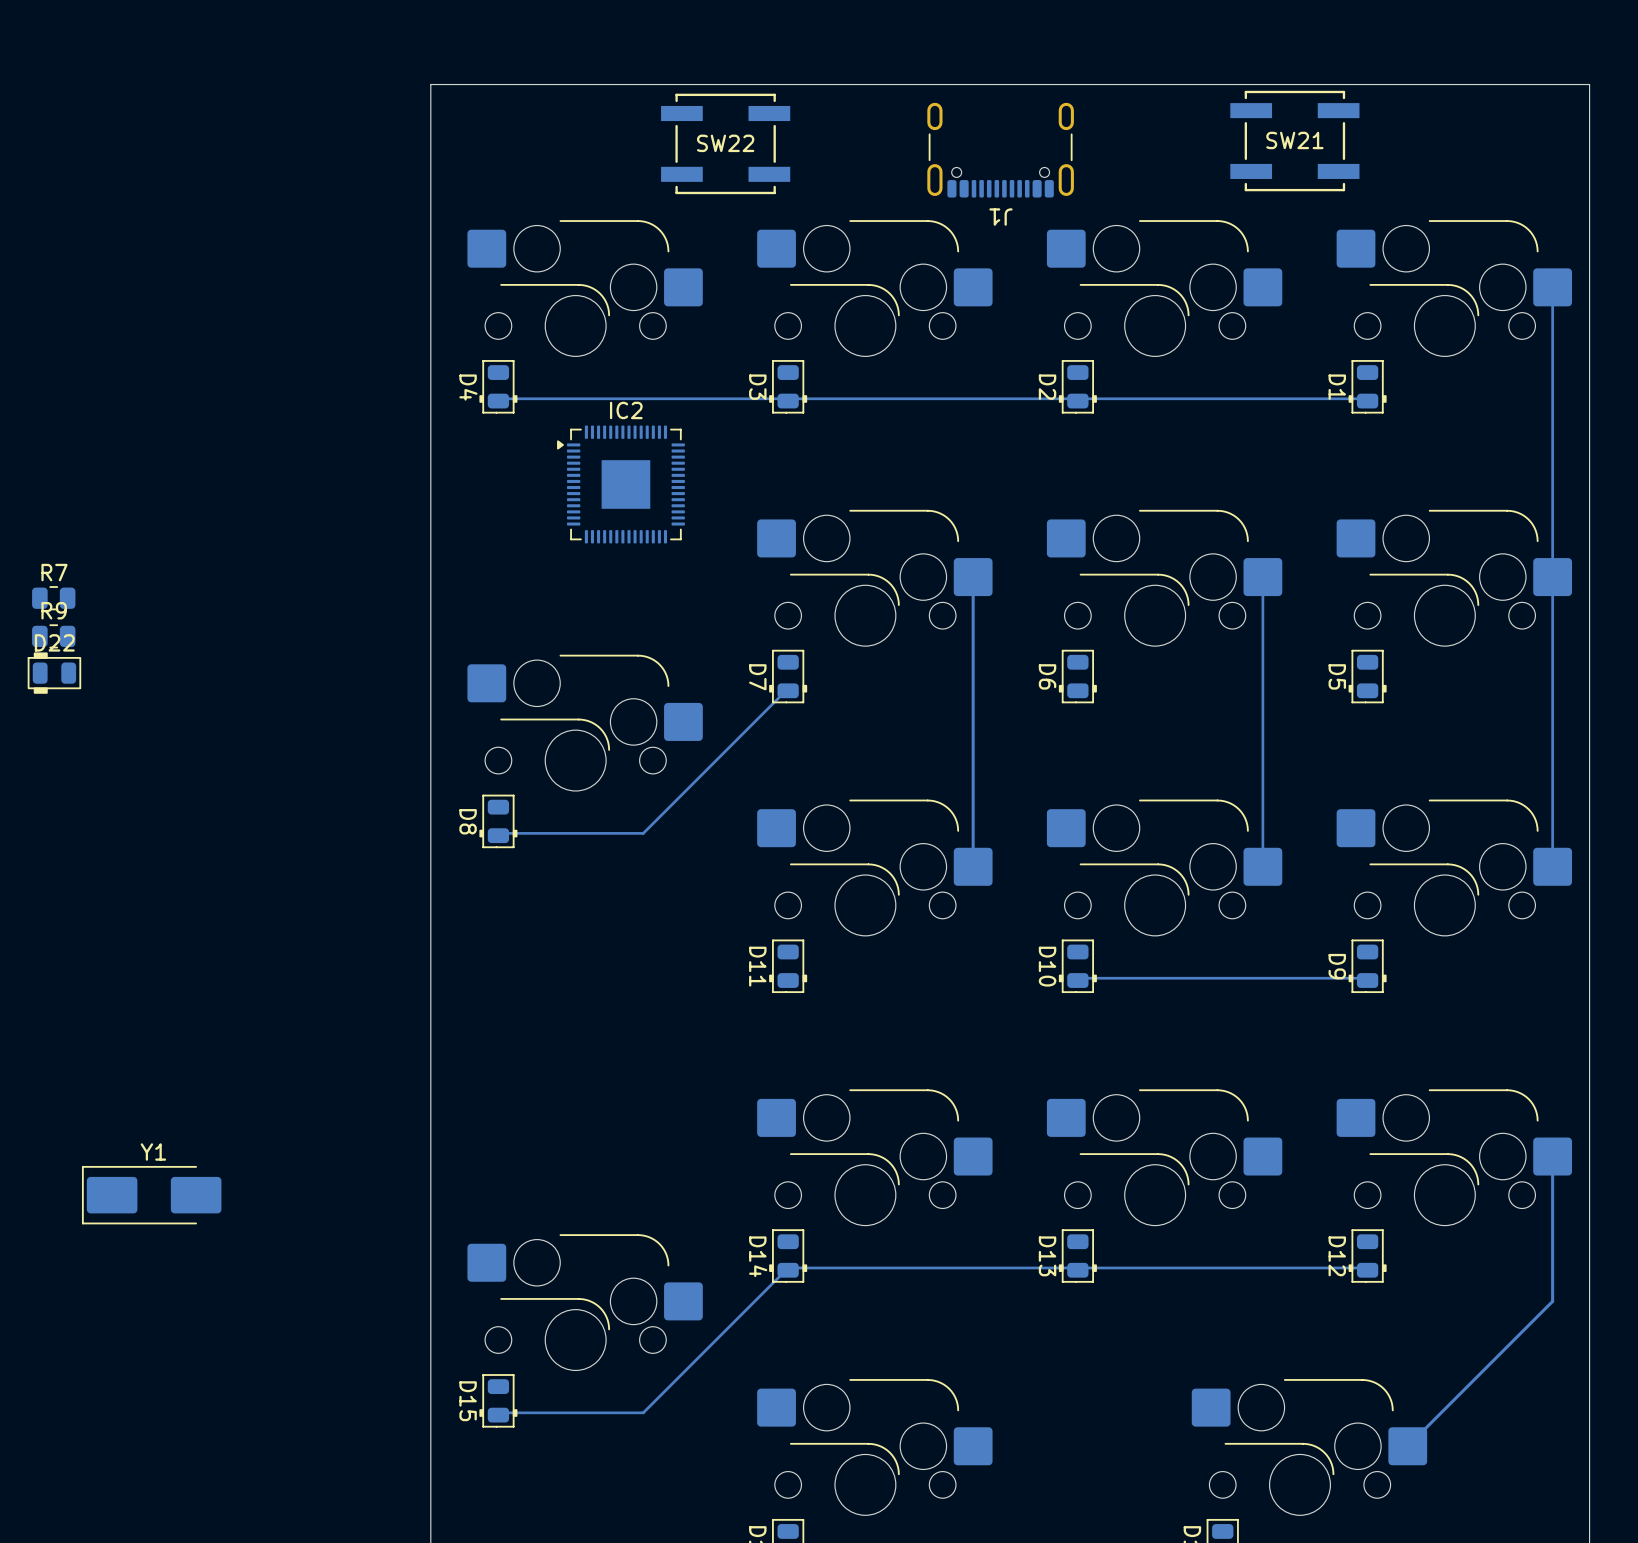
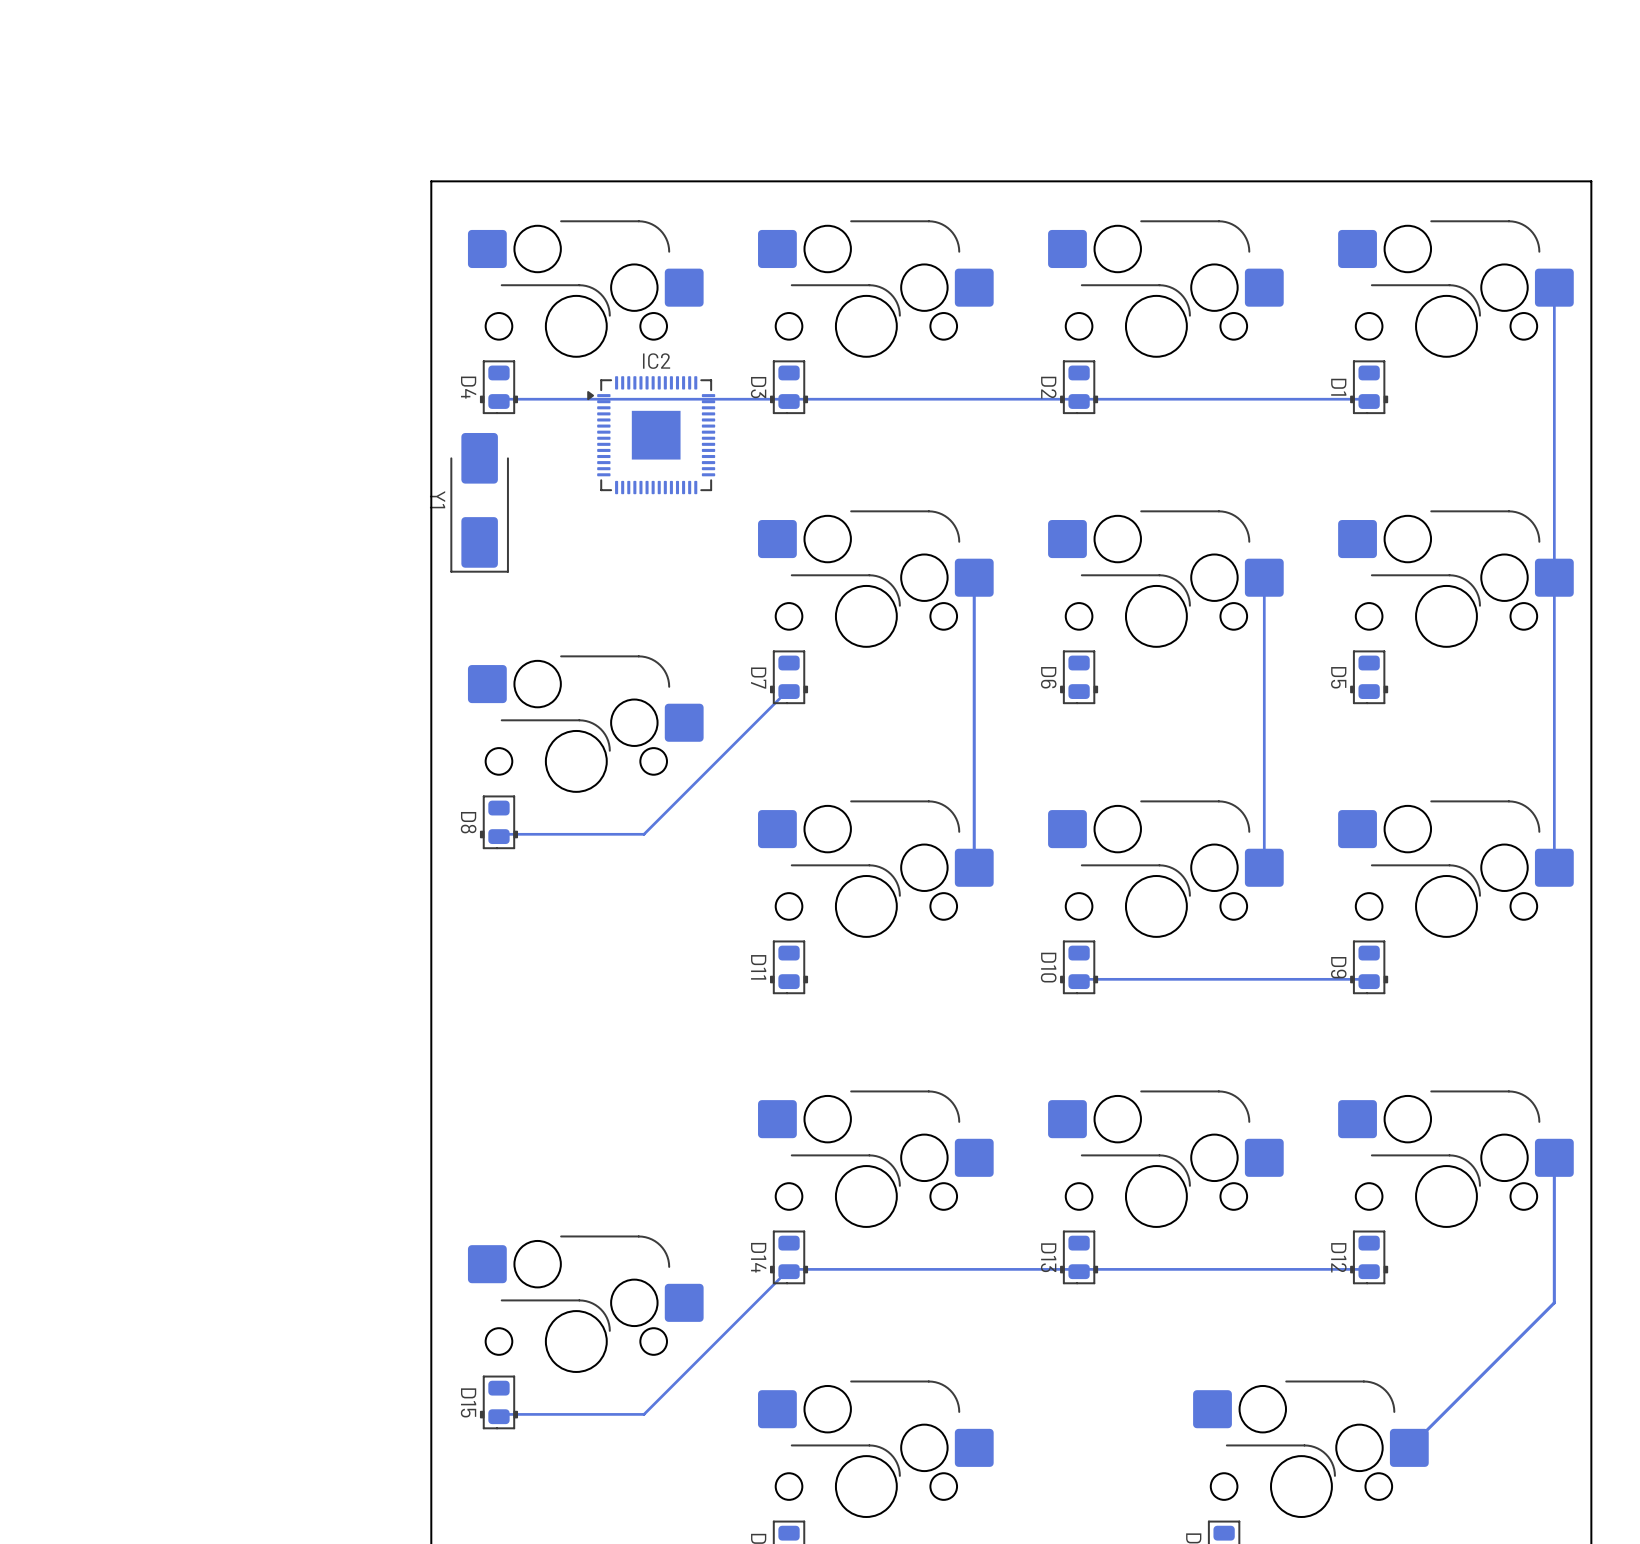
SW21: (1294, 141) -> none
SW22: (725, 143) -> none
J1: (1000, 150) -> none
board edge: (1589, 181) (1589, 84) (430, 84) (430, 181) -> (1591, 181) (431, 181)
IC2 position: (620, 484) -> (651, 435)
R7: (53, 598) -> none
R9: (53, 636) -> none
D22: (54, 673) -> none
Y1 rotation: 0° (151, 1195) -> 90° counterclockwise (479, 502)
Y1 position: (151, 1195) -> (479, 502)

